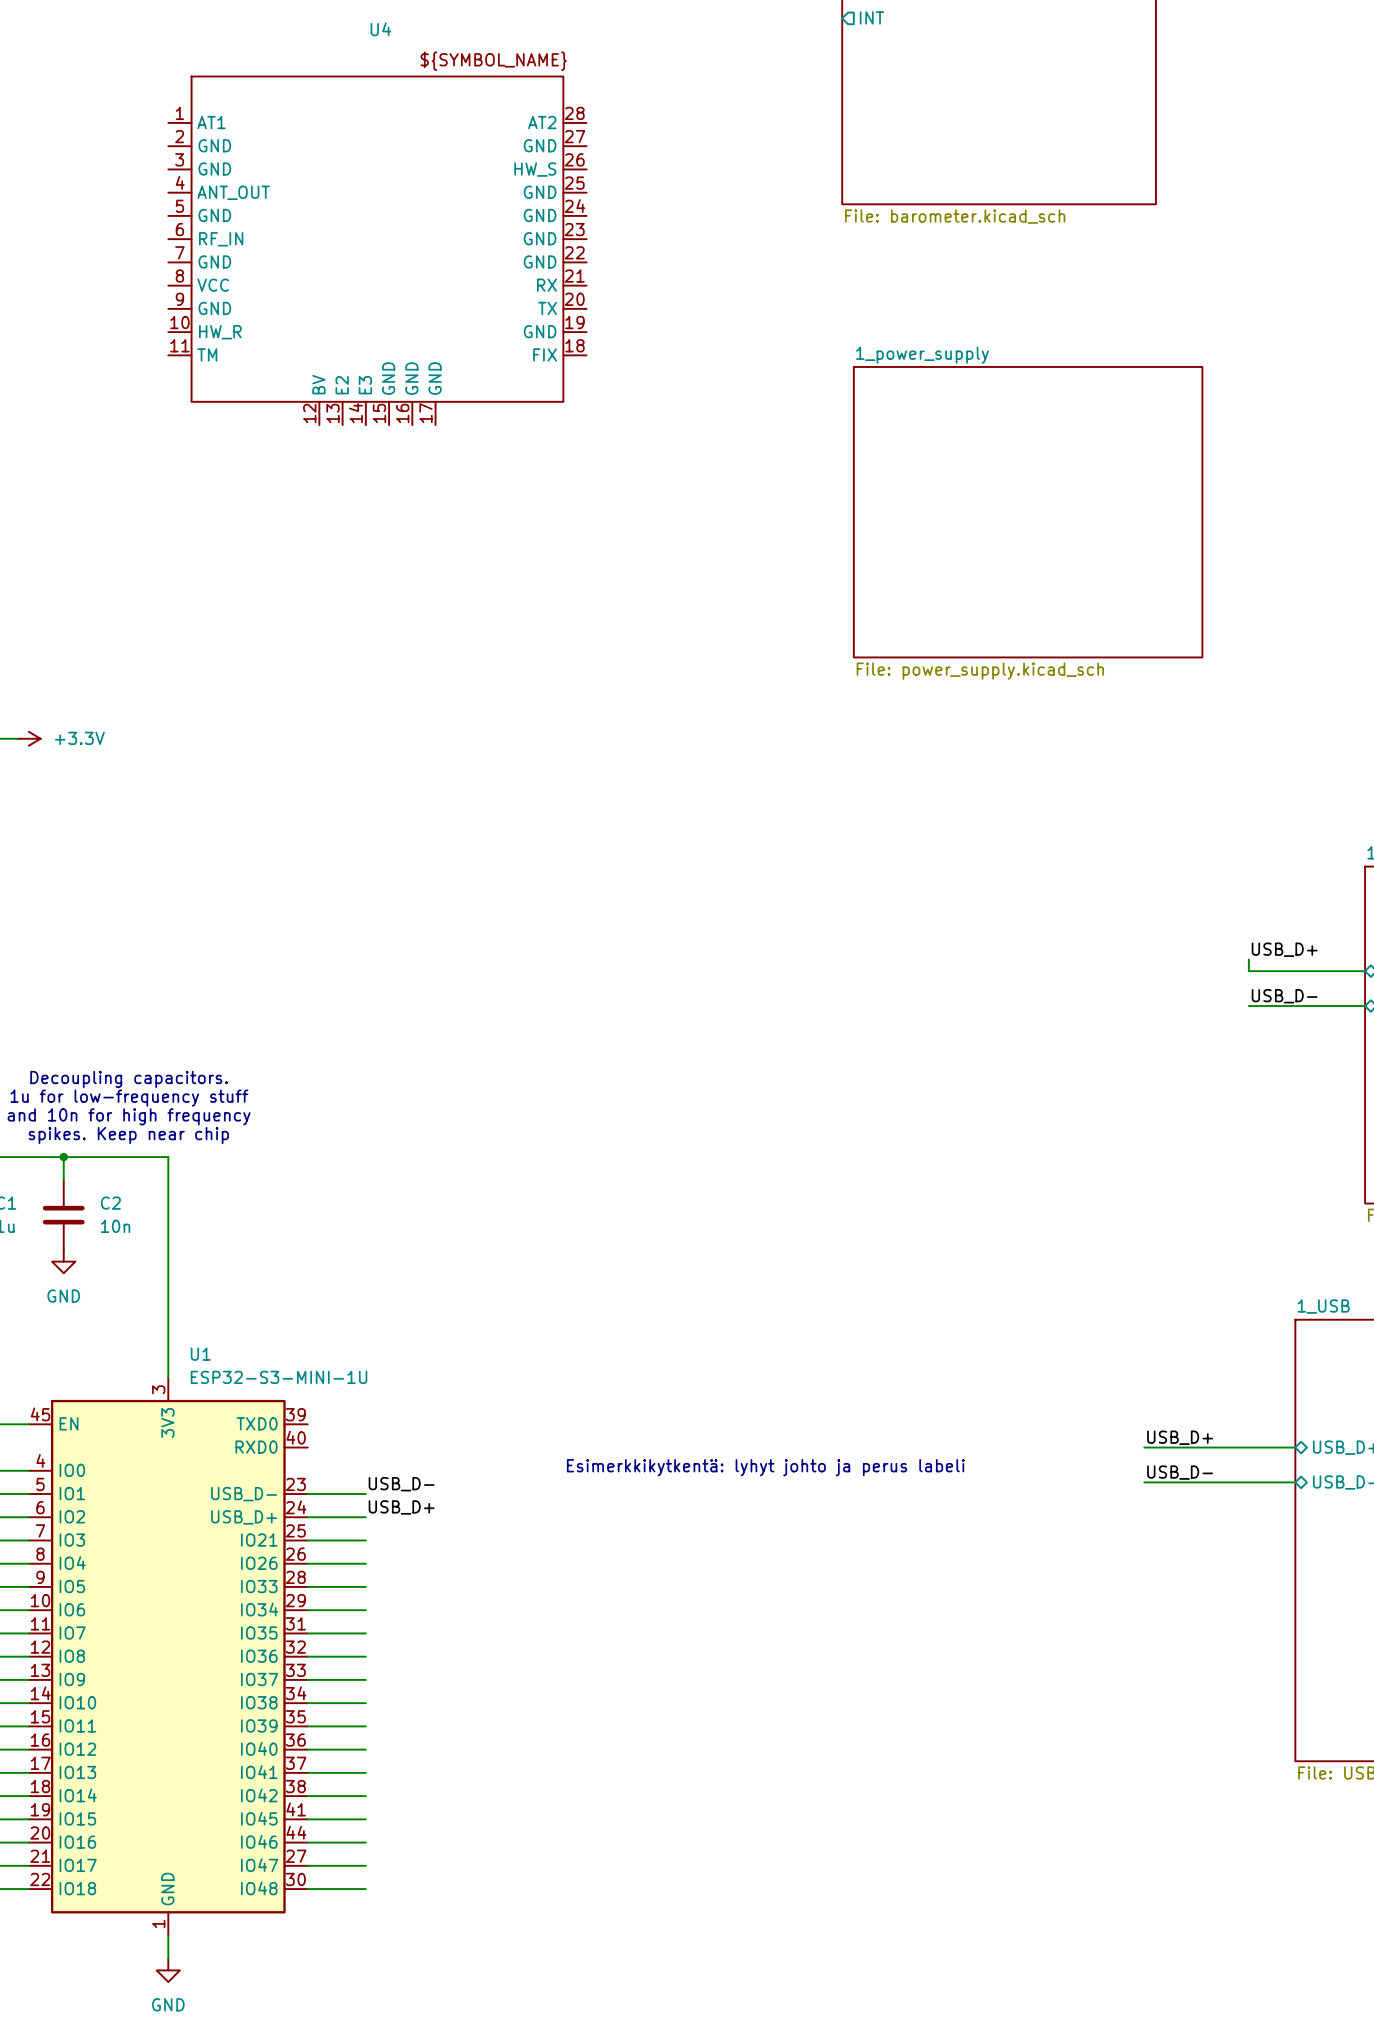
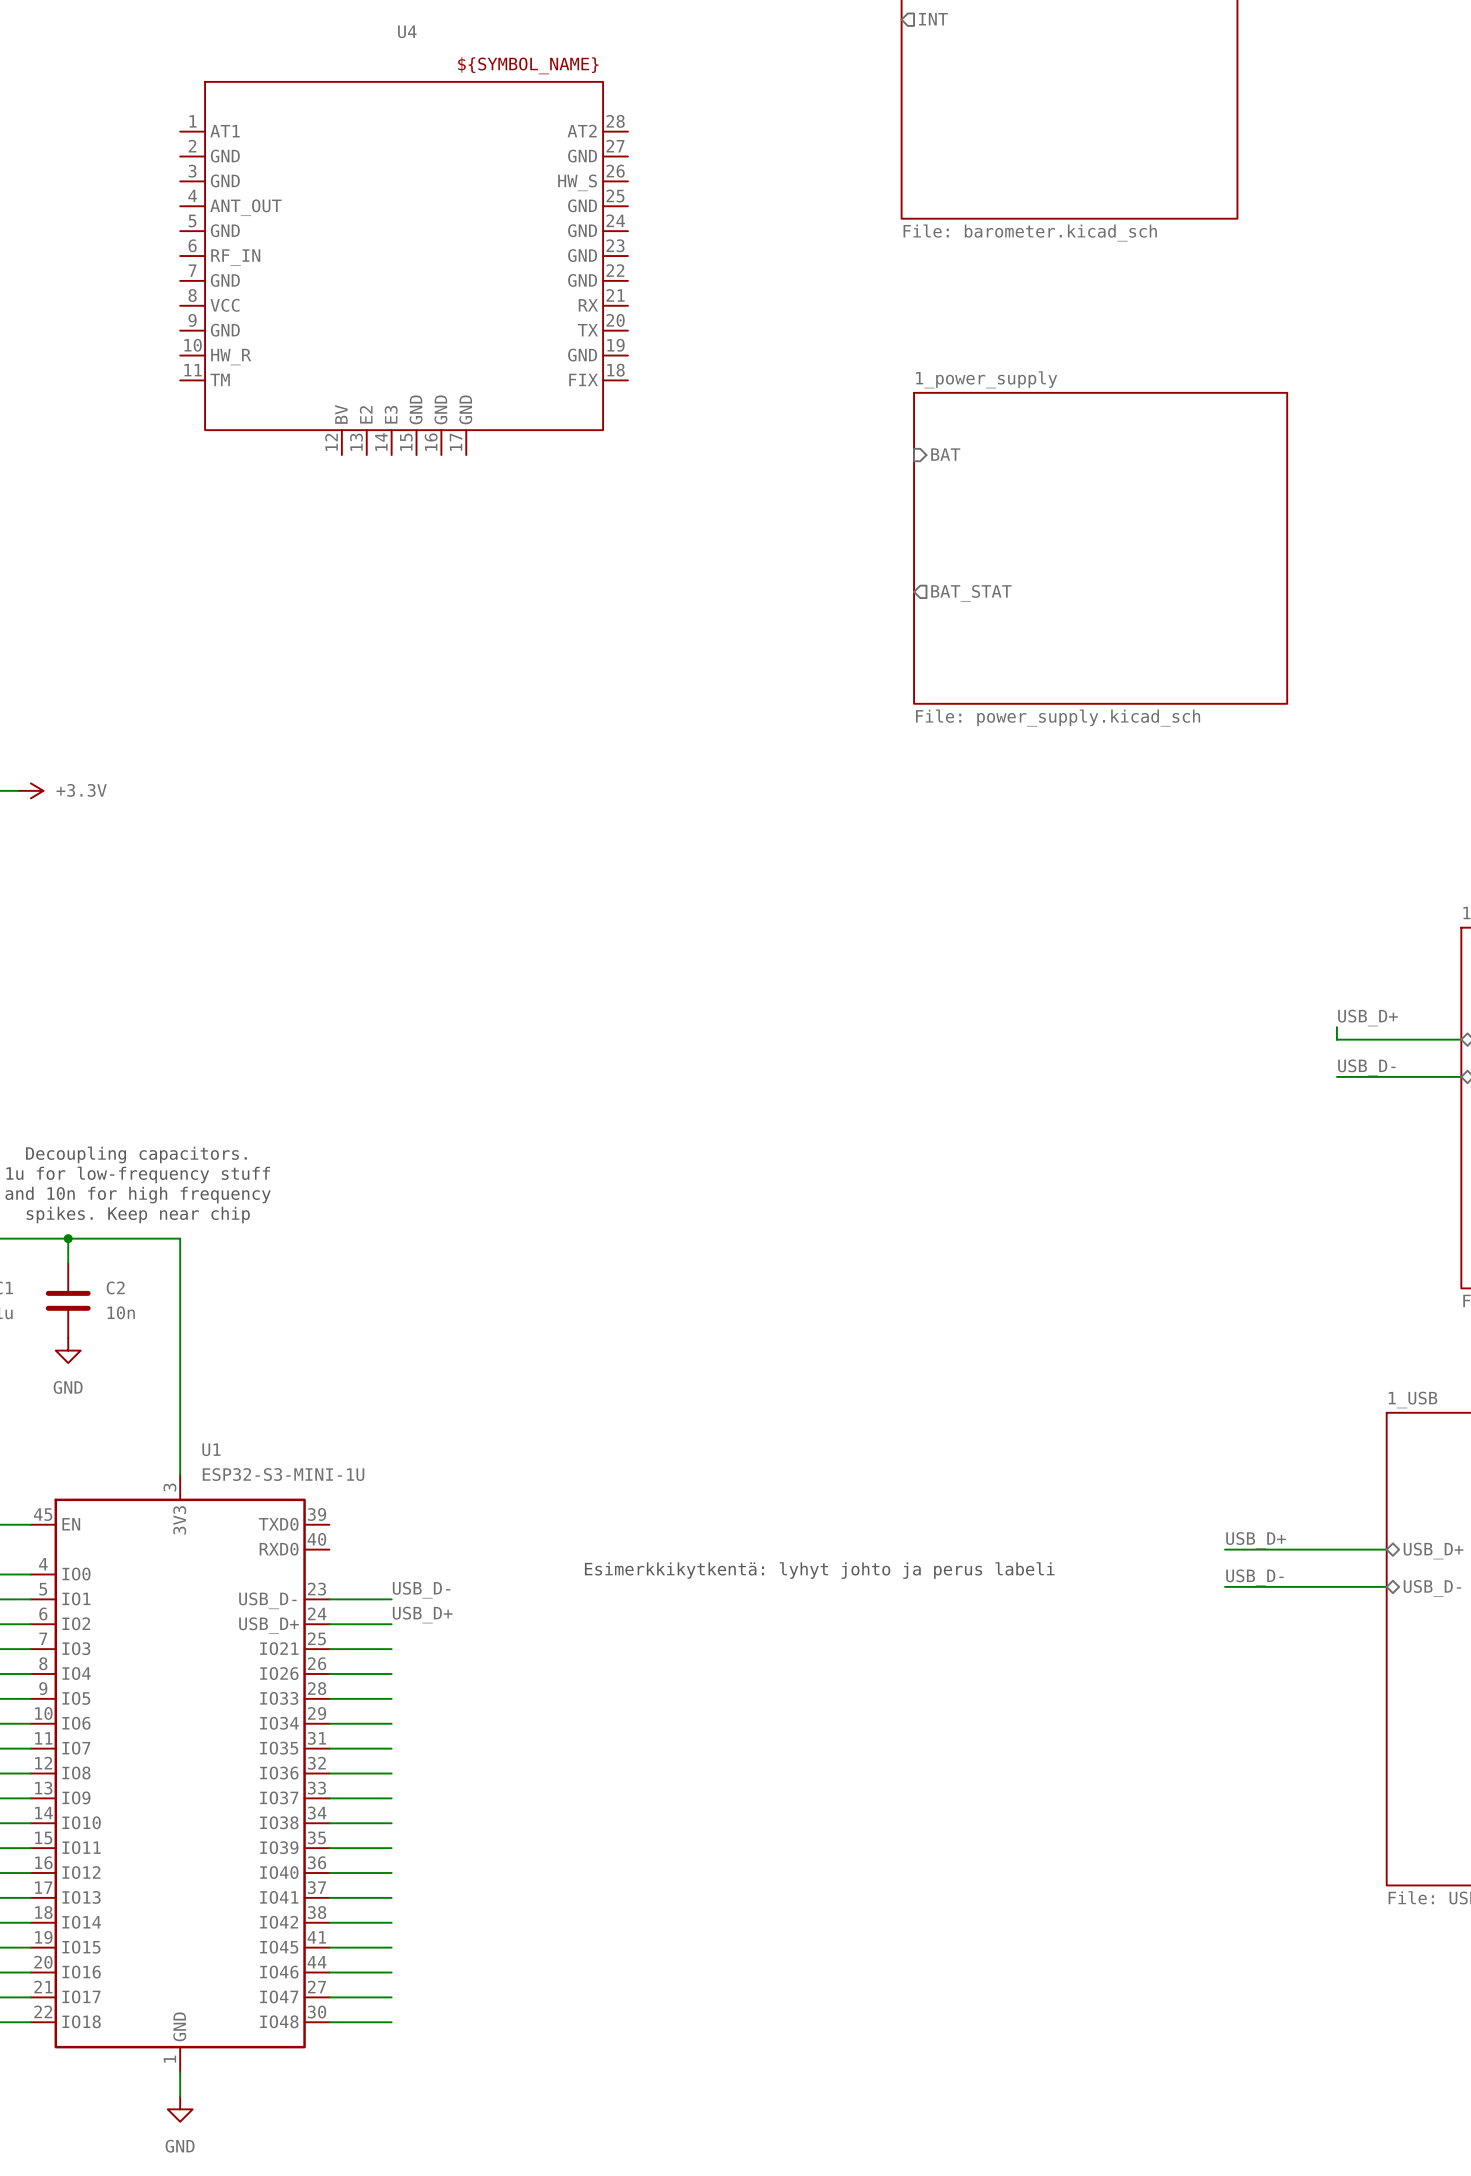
sheet pin: none -> BAT (945, 454)
sheet pin: none -> BAT_STAT (971, 593)

